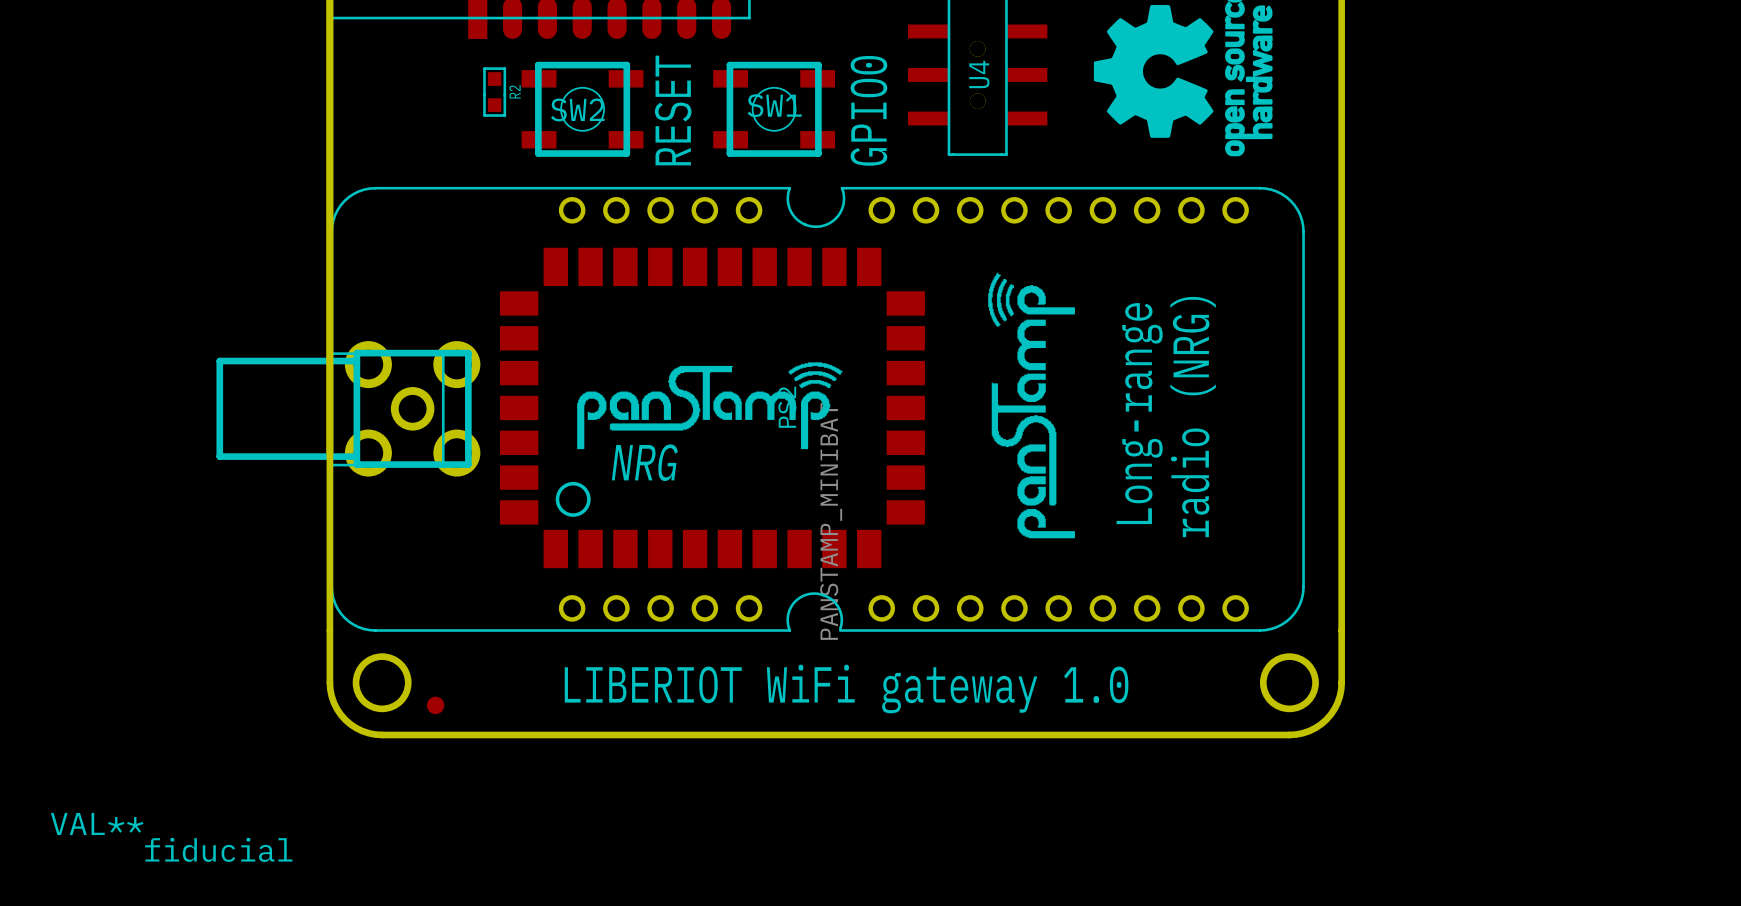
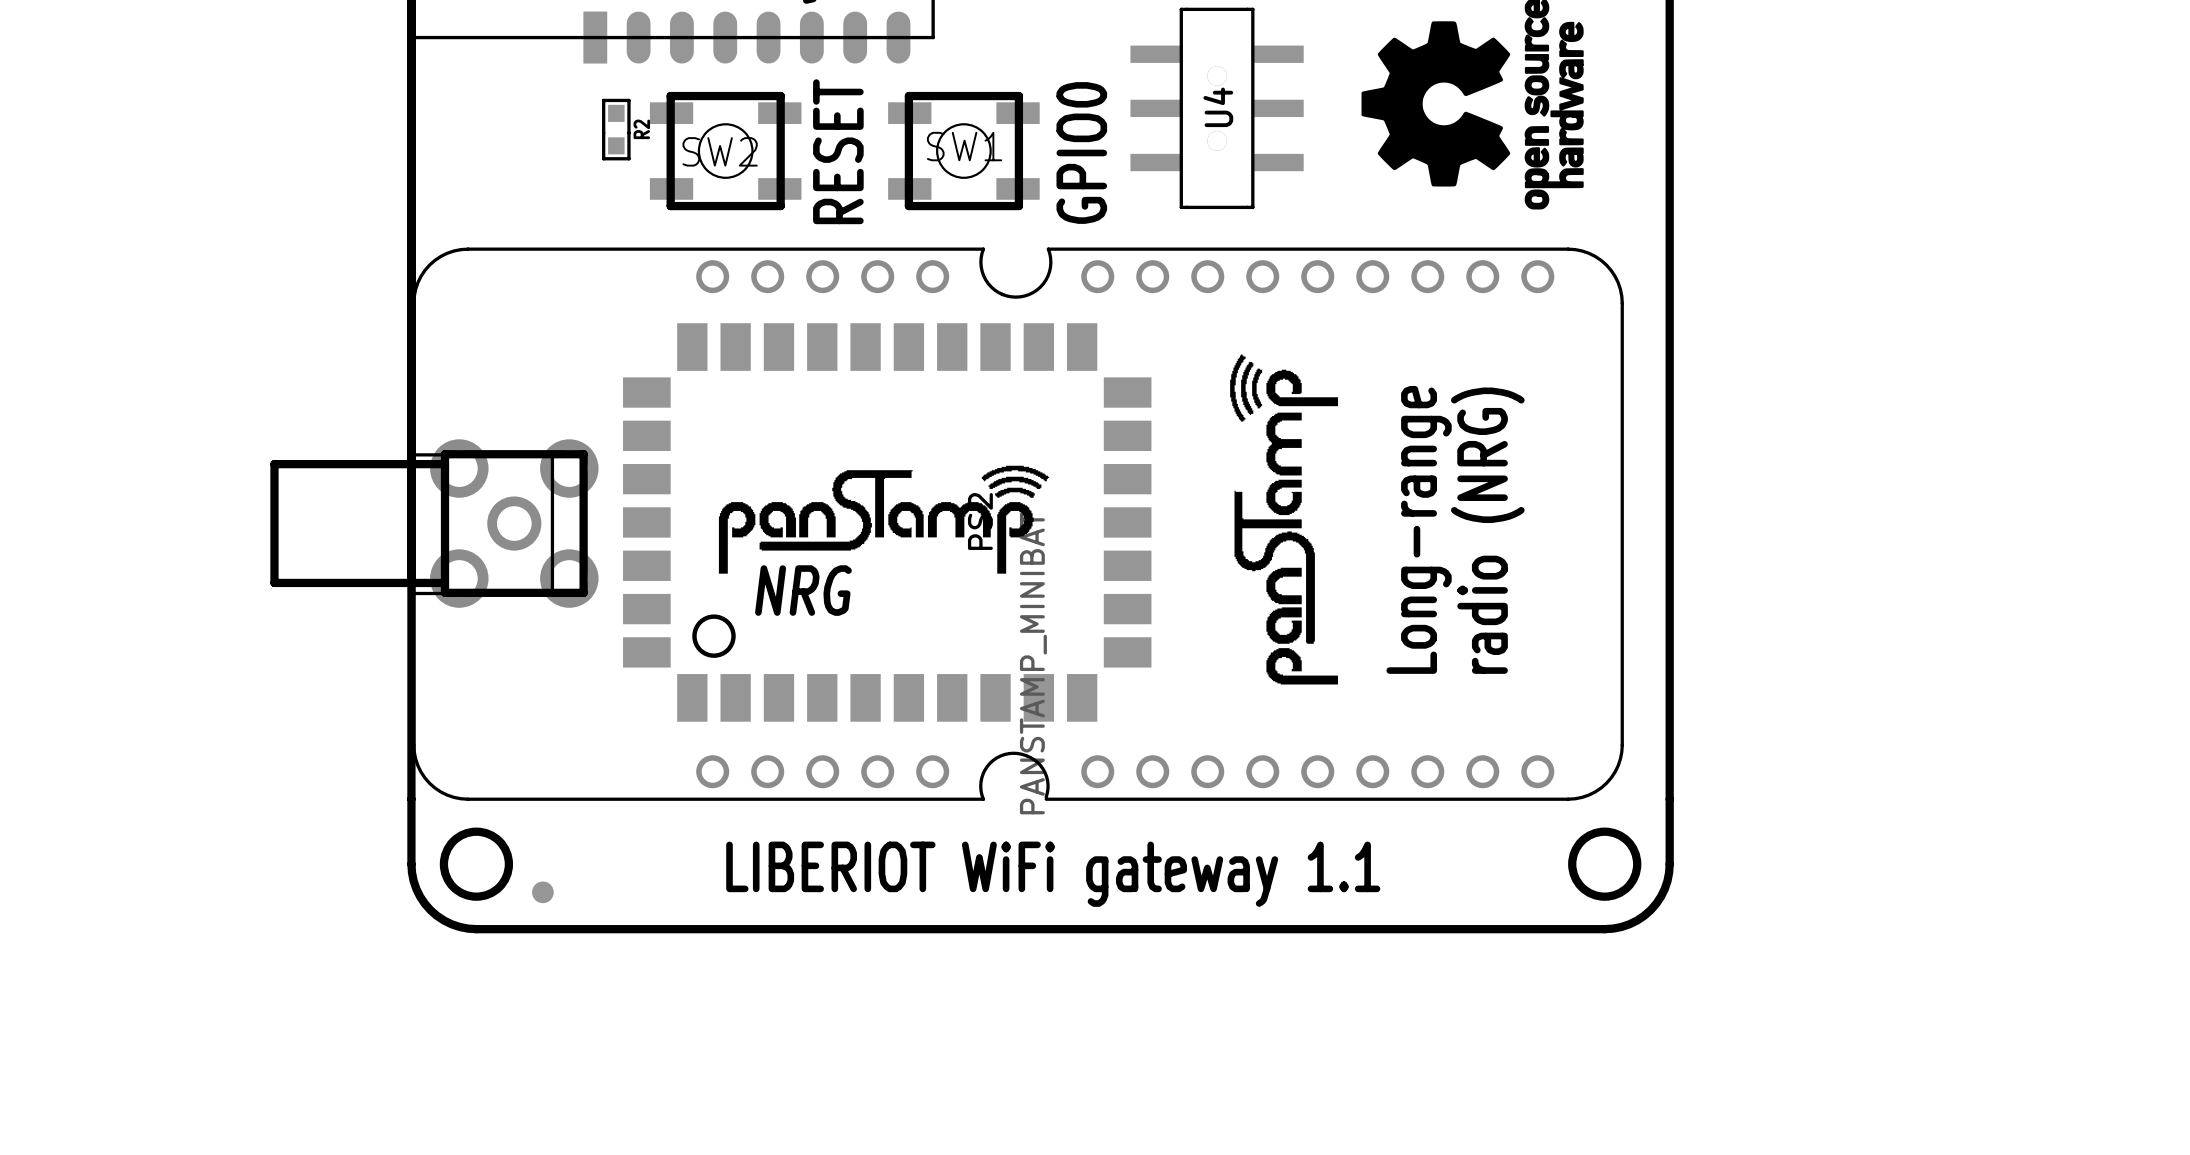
text: LIBERIOT WiFi gateway 1.0 (846, 689) -> LIBERIOT WiFi gateway 1.1 (1053, 874)
fiducial value: VAL** (97, 823) -> none
fiducial name: fiducial (218, 849) -> none

